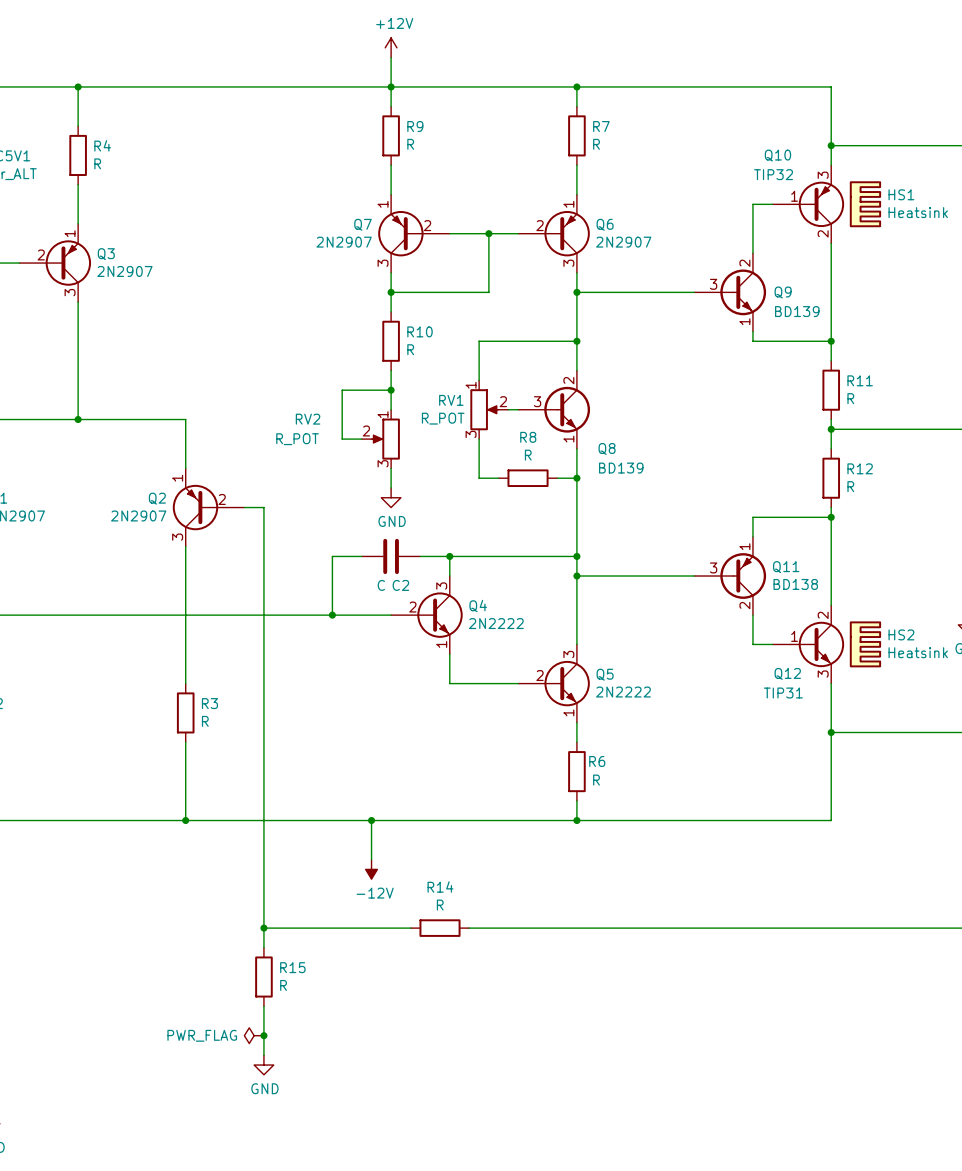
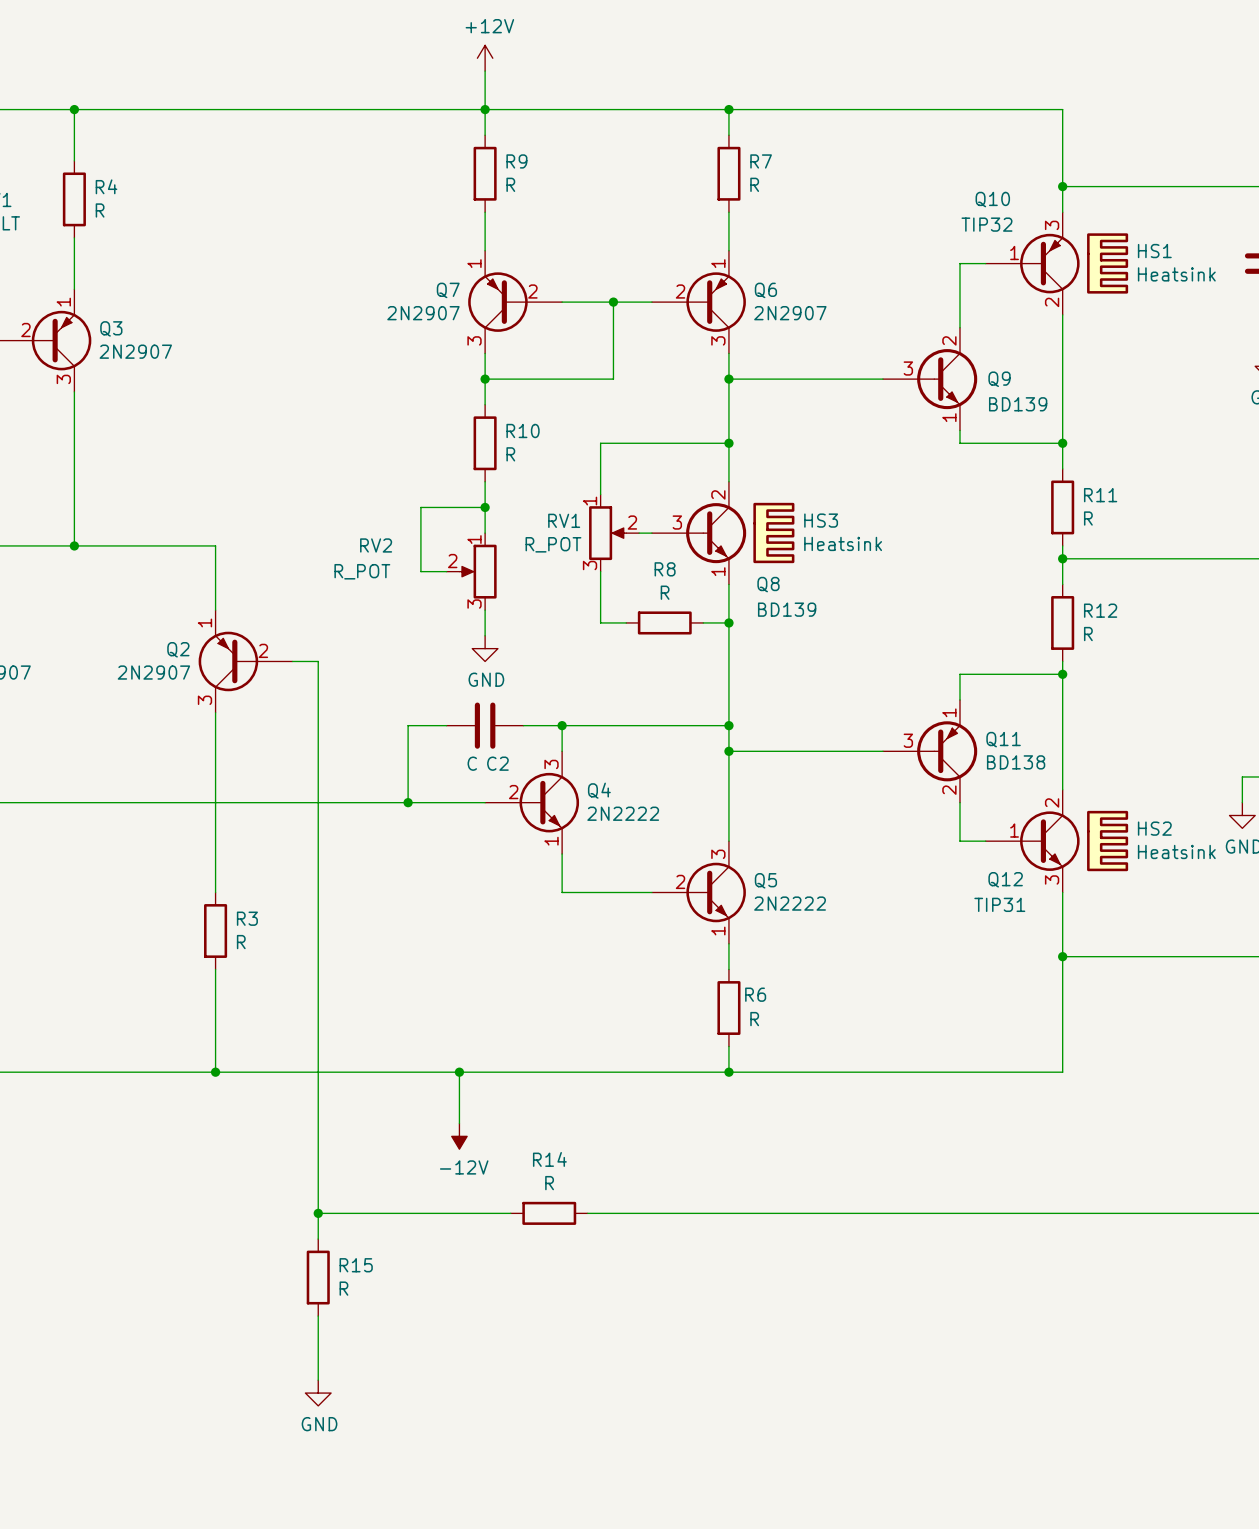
HS3: none -> Heatsink (773, 532)
power symbol: PWR_FLAG (254, 1035) -> none
junction: (263, 1035) -> none

